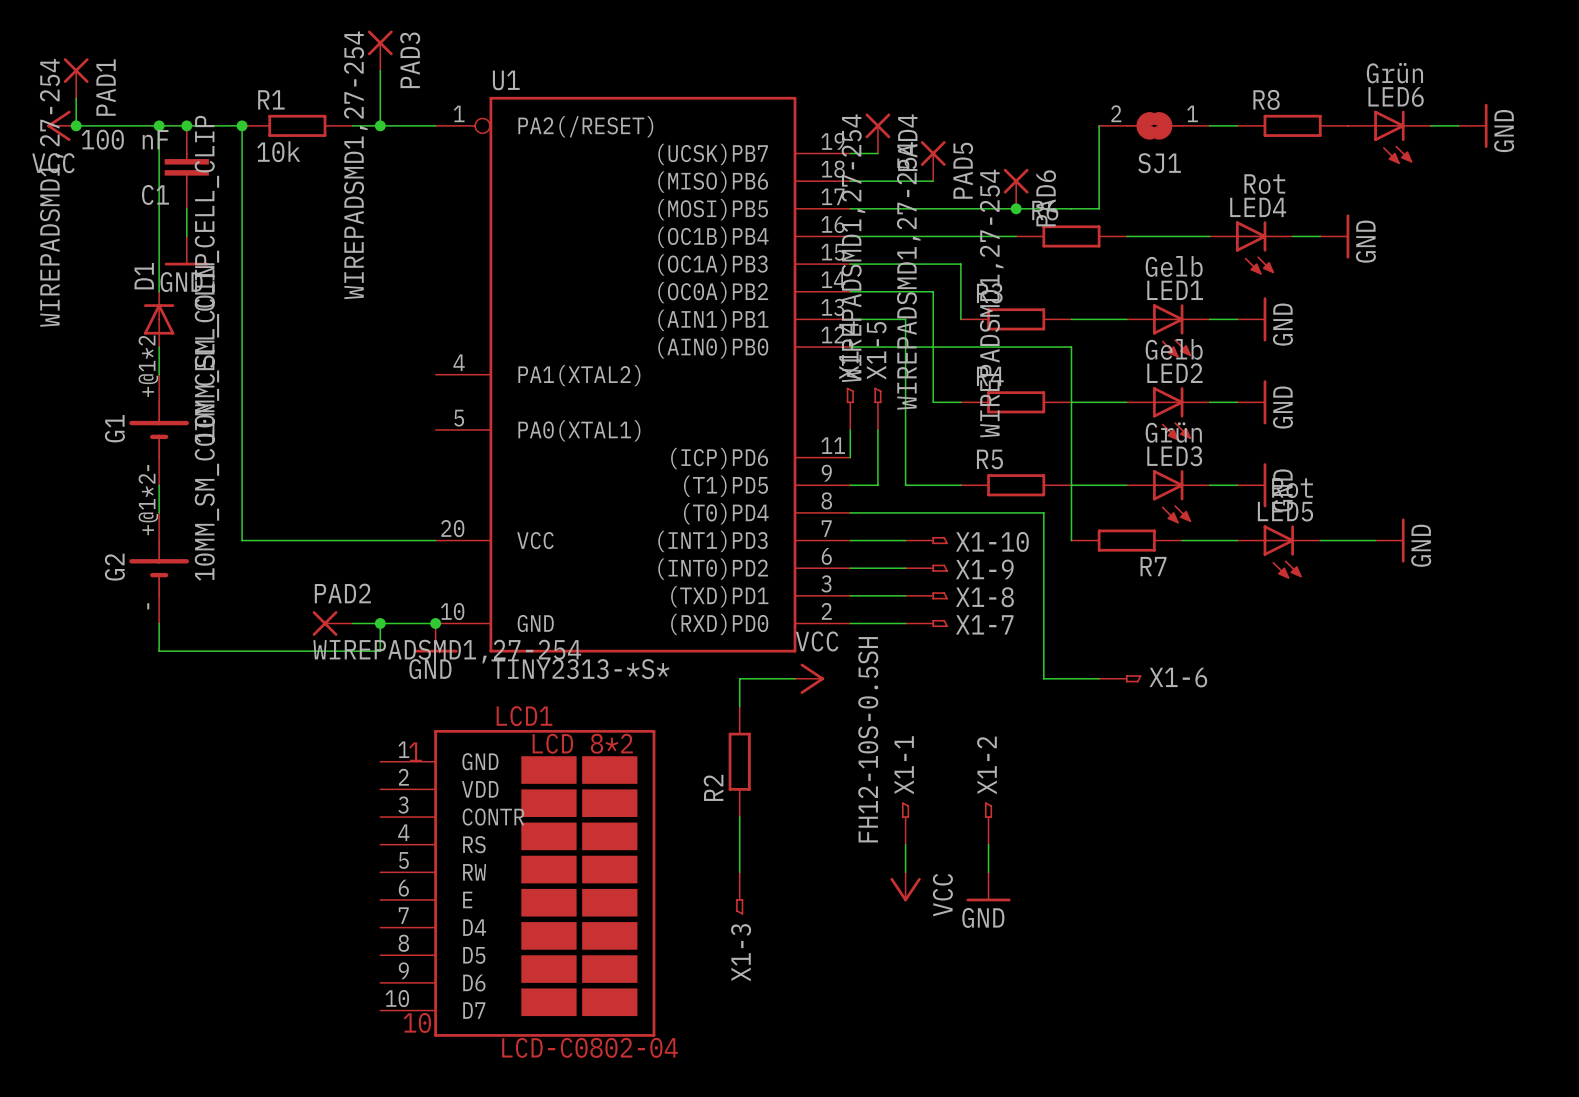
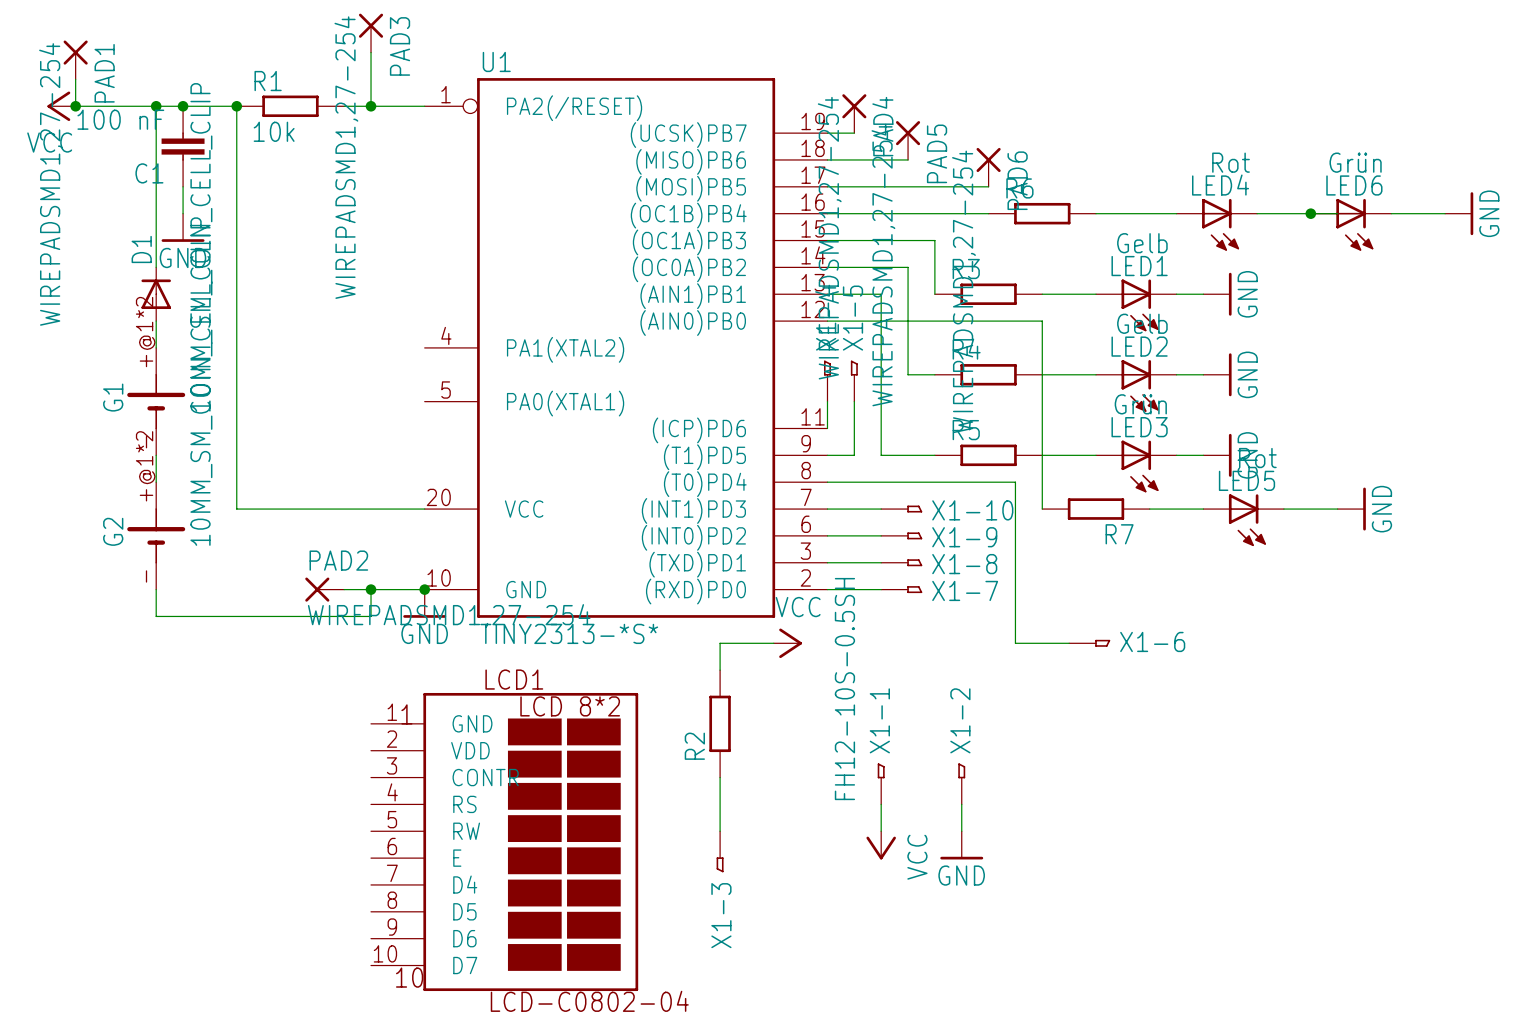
wire: (1099, 125) (1099, 208) (1016, 208) -> none
SJ1: (1154, 125) -> none
wire: (1209, 125) (1237, 125) -> none
R8: (1292, 125) -> none
wire: (1430, 125) (1458, 125) -> none
power symbol: GND (1473, 125) -> none
LED6 position: (1389, 137) -> (1351, 224)
junction: (1016, 208) -> none
power symbol: GND (1334, 236) -> none
junction: none -> (1310, 213)
wire: none -> (1391, 213) (1445, 213)
power symbol: none -> GND (1459, 213)

